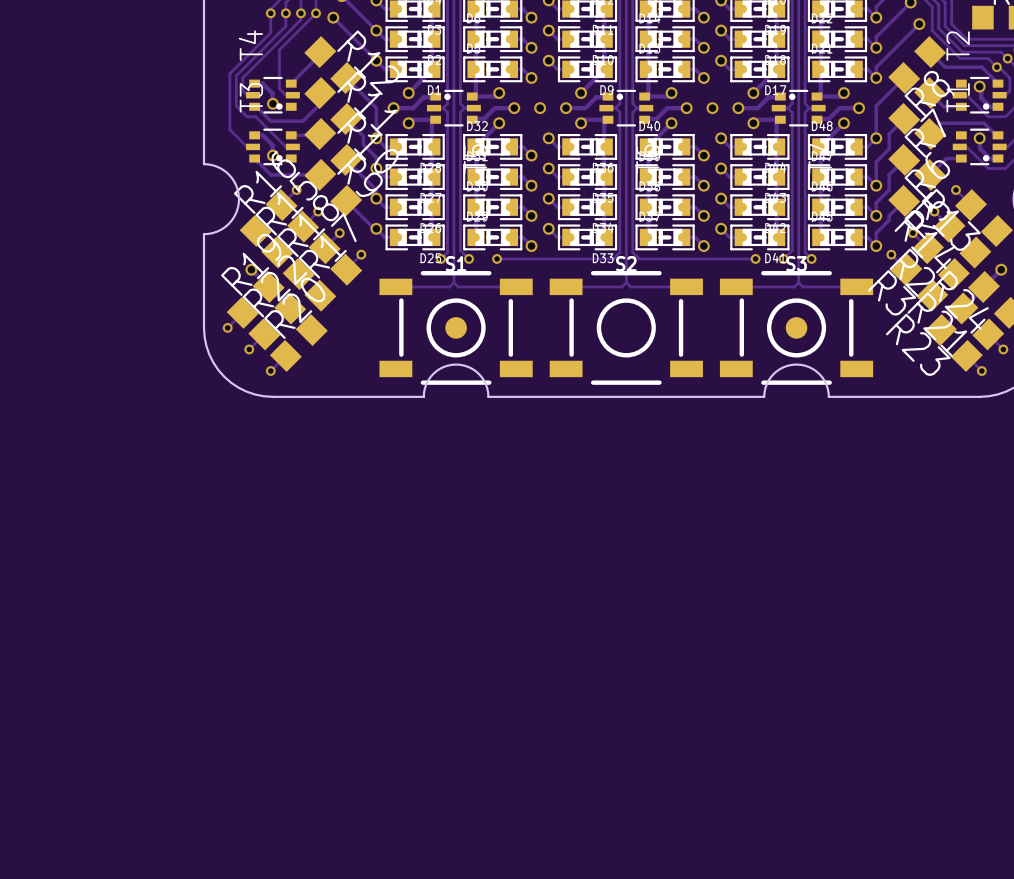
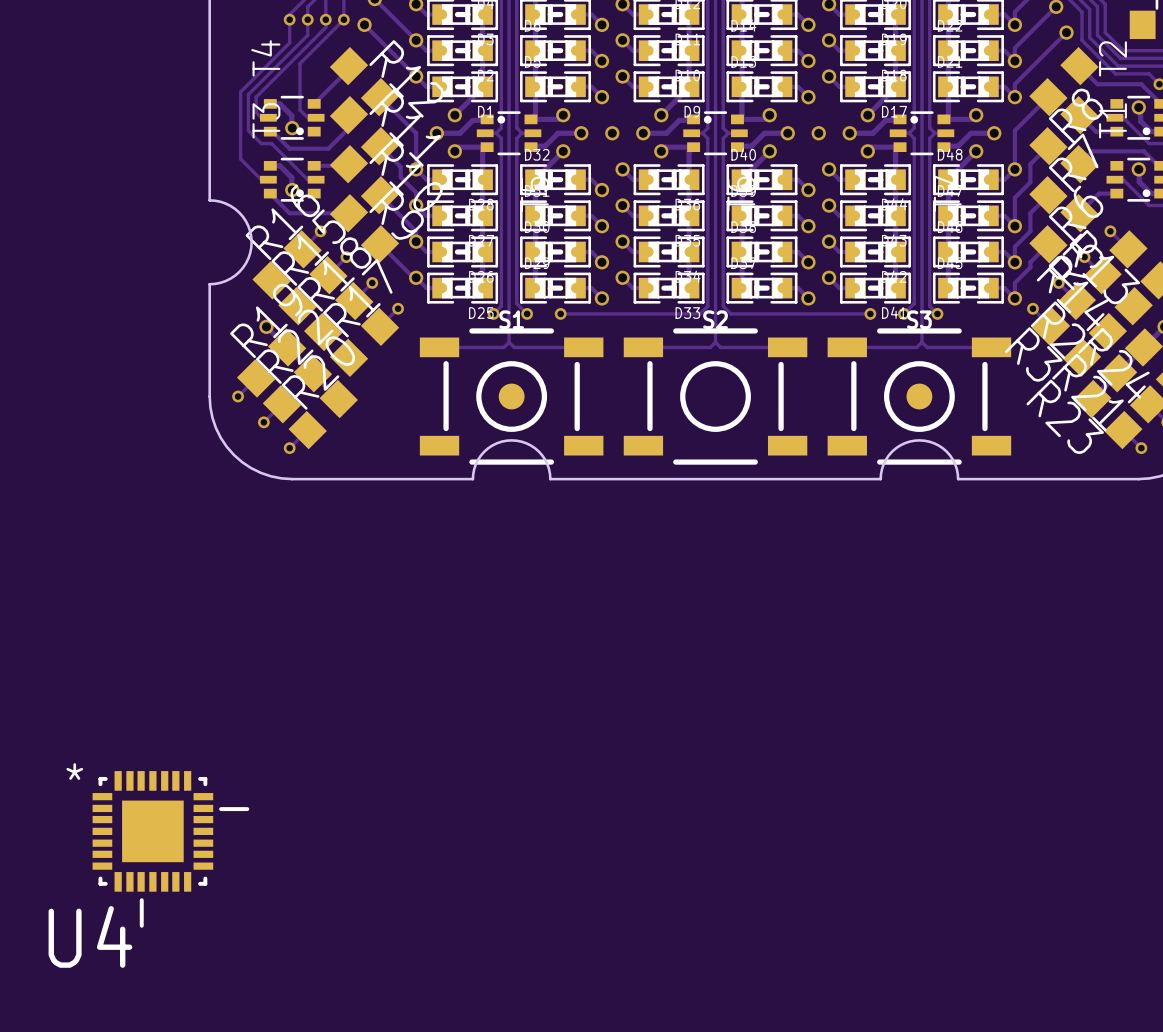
U4: none -> (170, 849)

